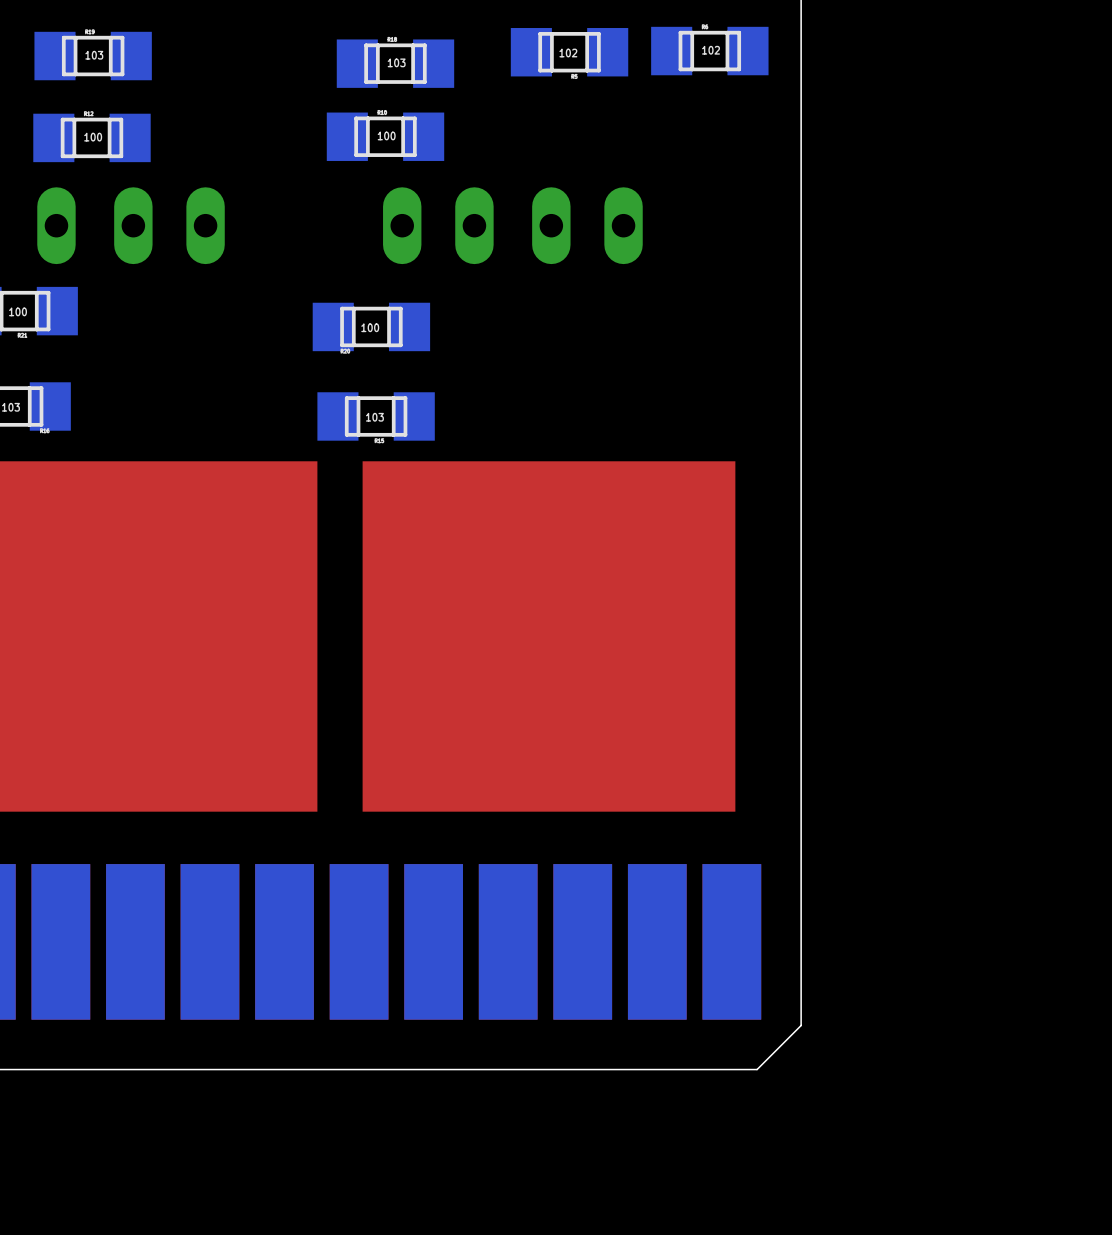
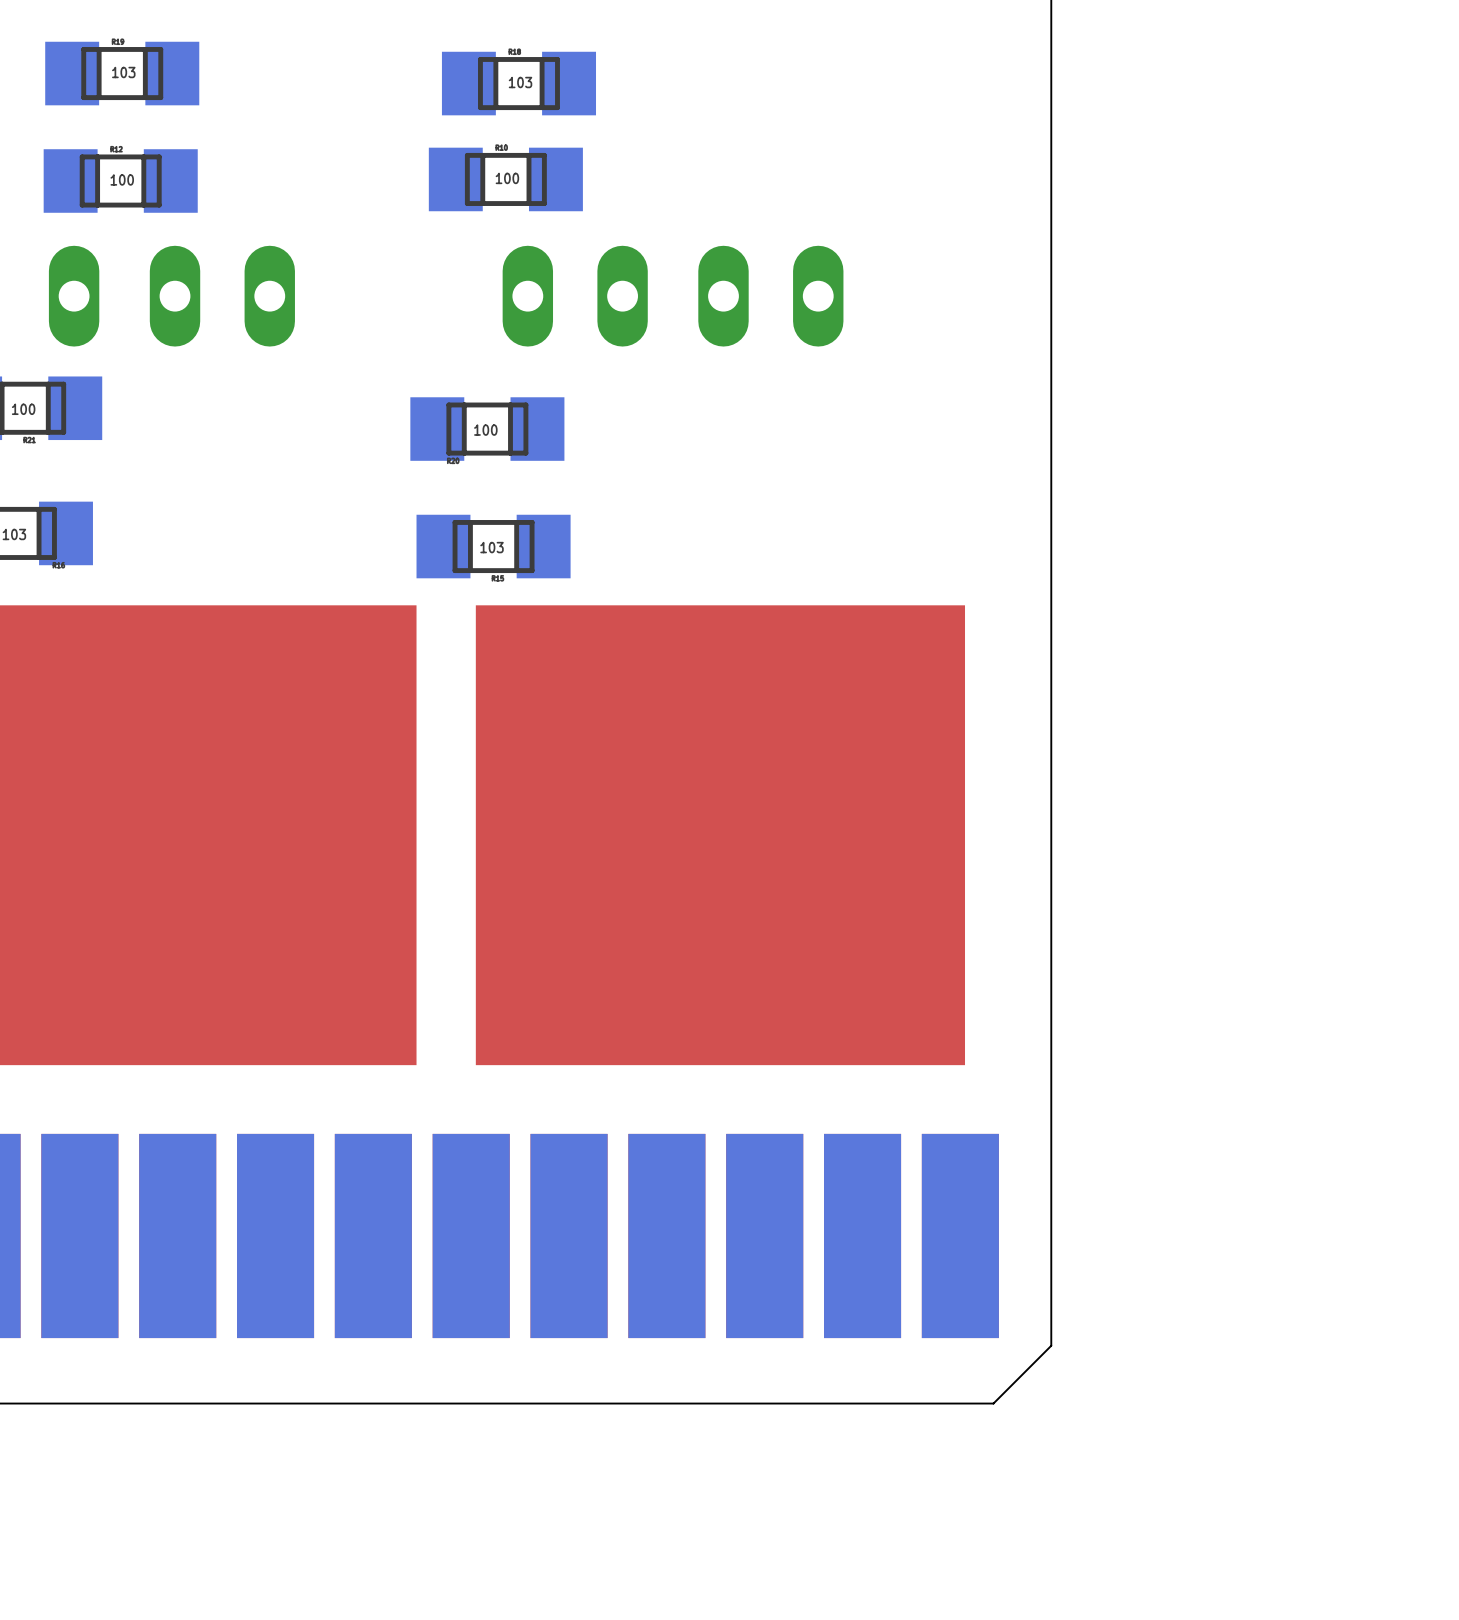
part: (709, 51) -> none
part: (569, 52) -> none

